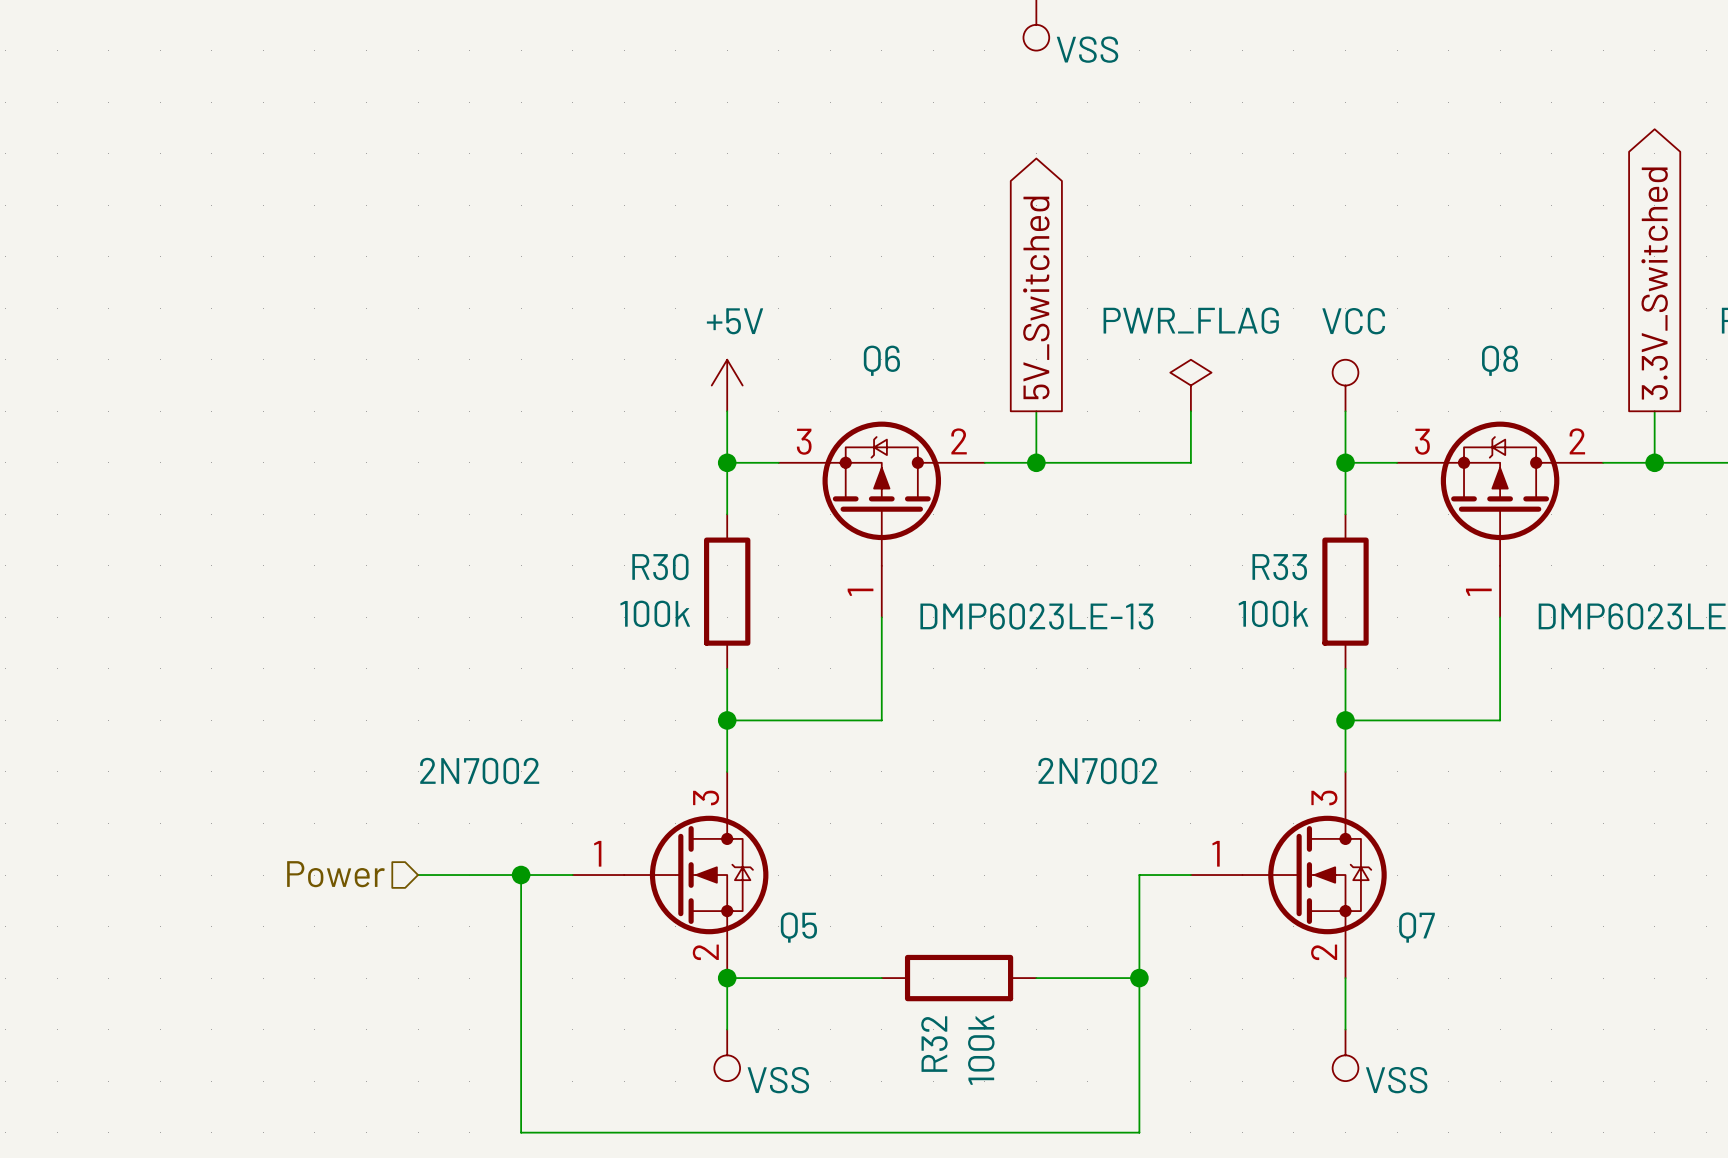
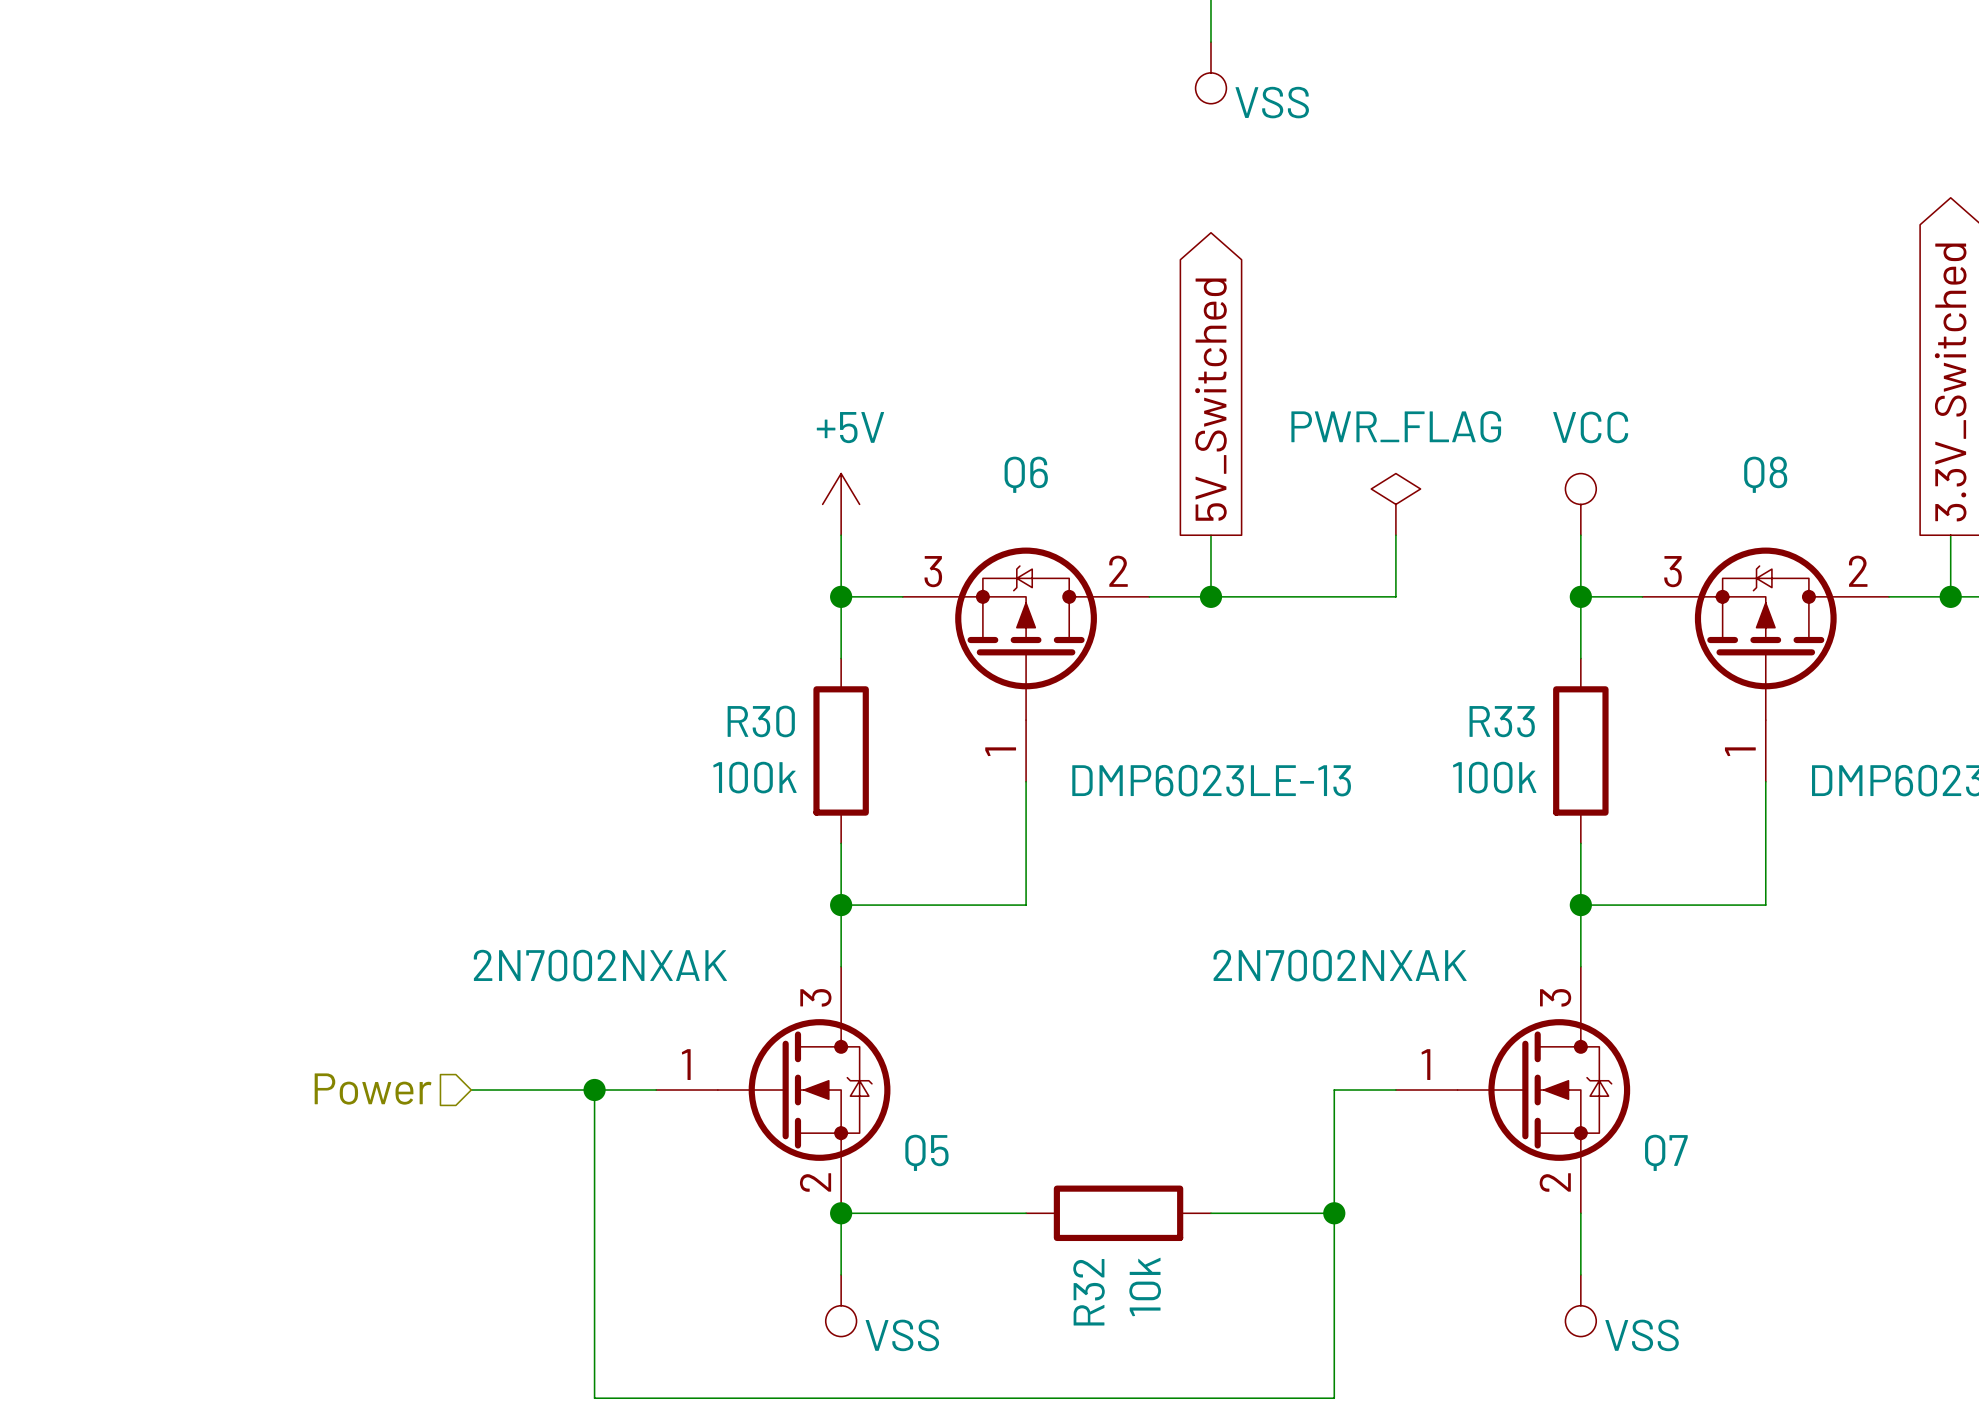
Q5 value: 2N7002 (479, 771) -> 2N7002NXAK (600, 965)
Q7 value: 2N7002 (1098, 771) -> 2N7002NXAK (1340, 965)
R32 value: 100k (981, 1050) -> 10k (1145, 1286)

